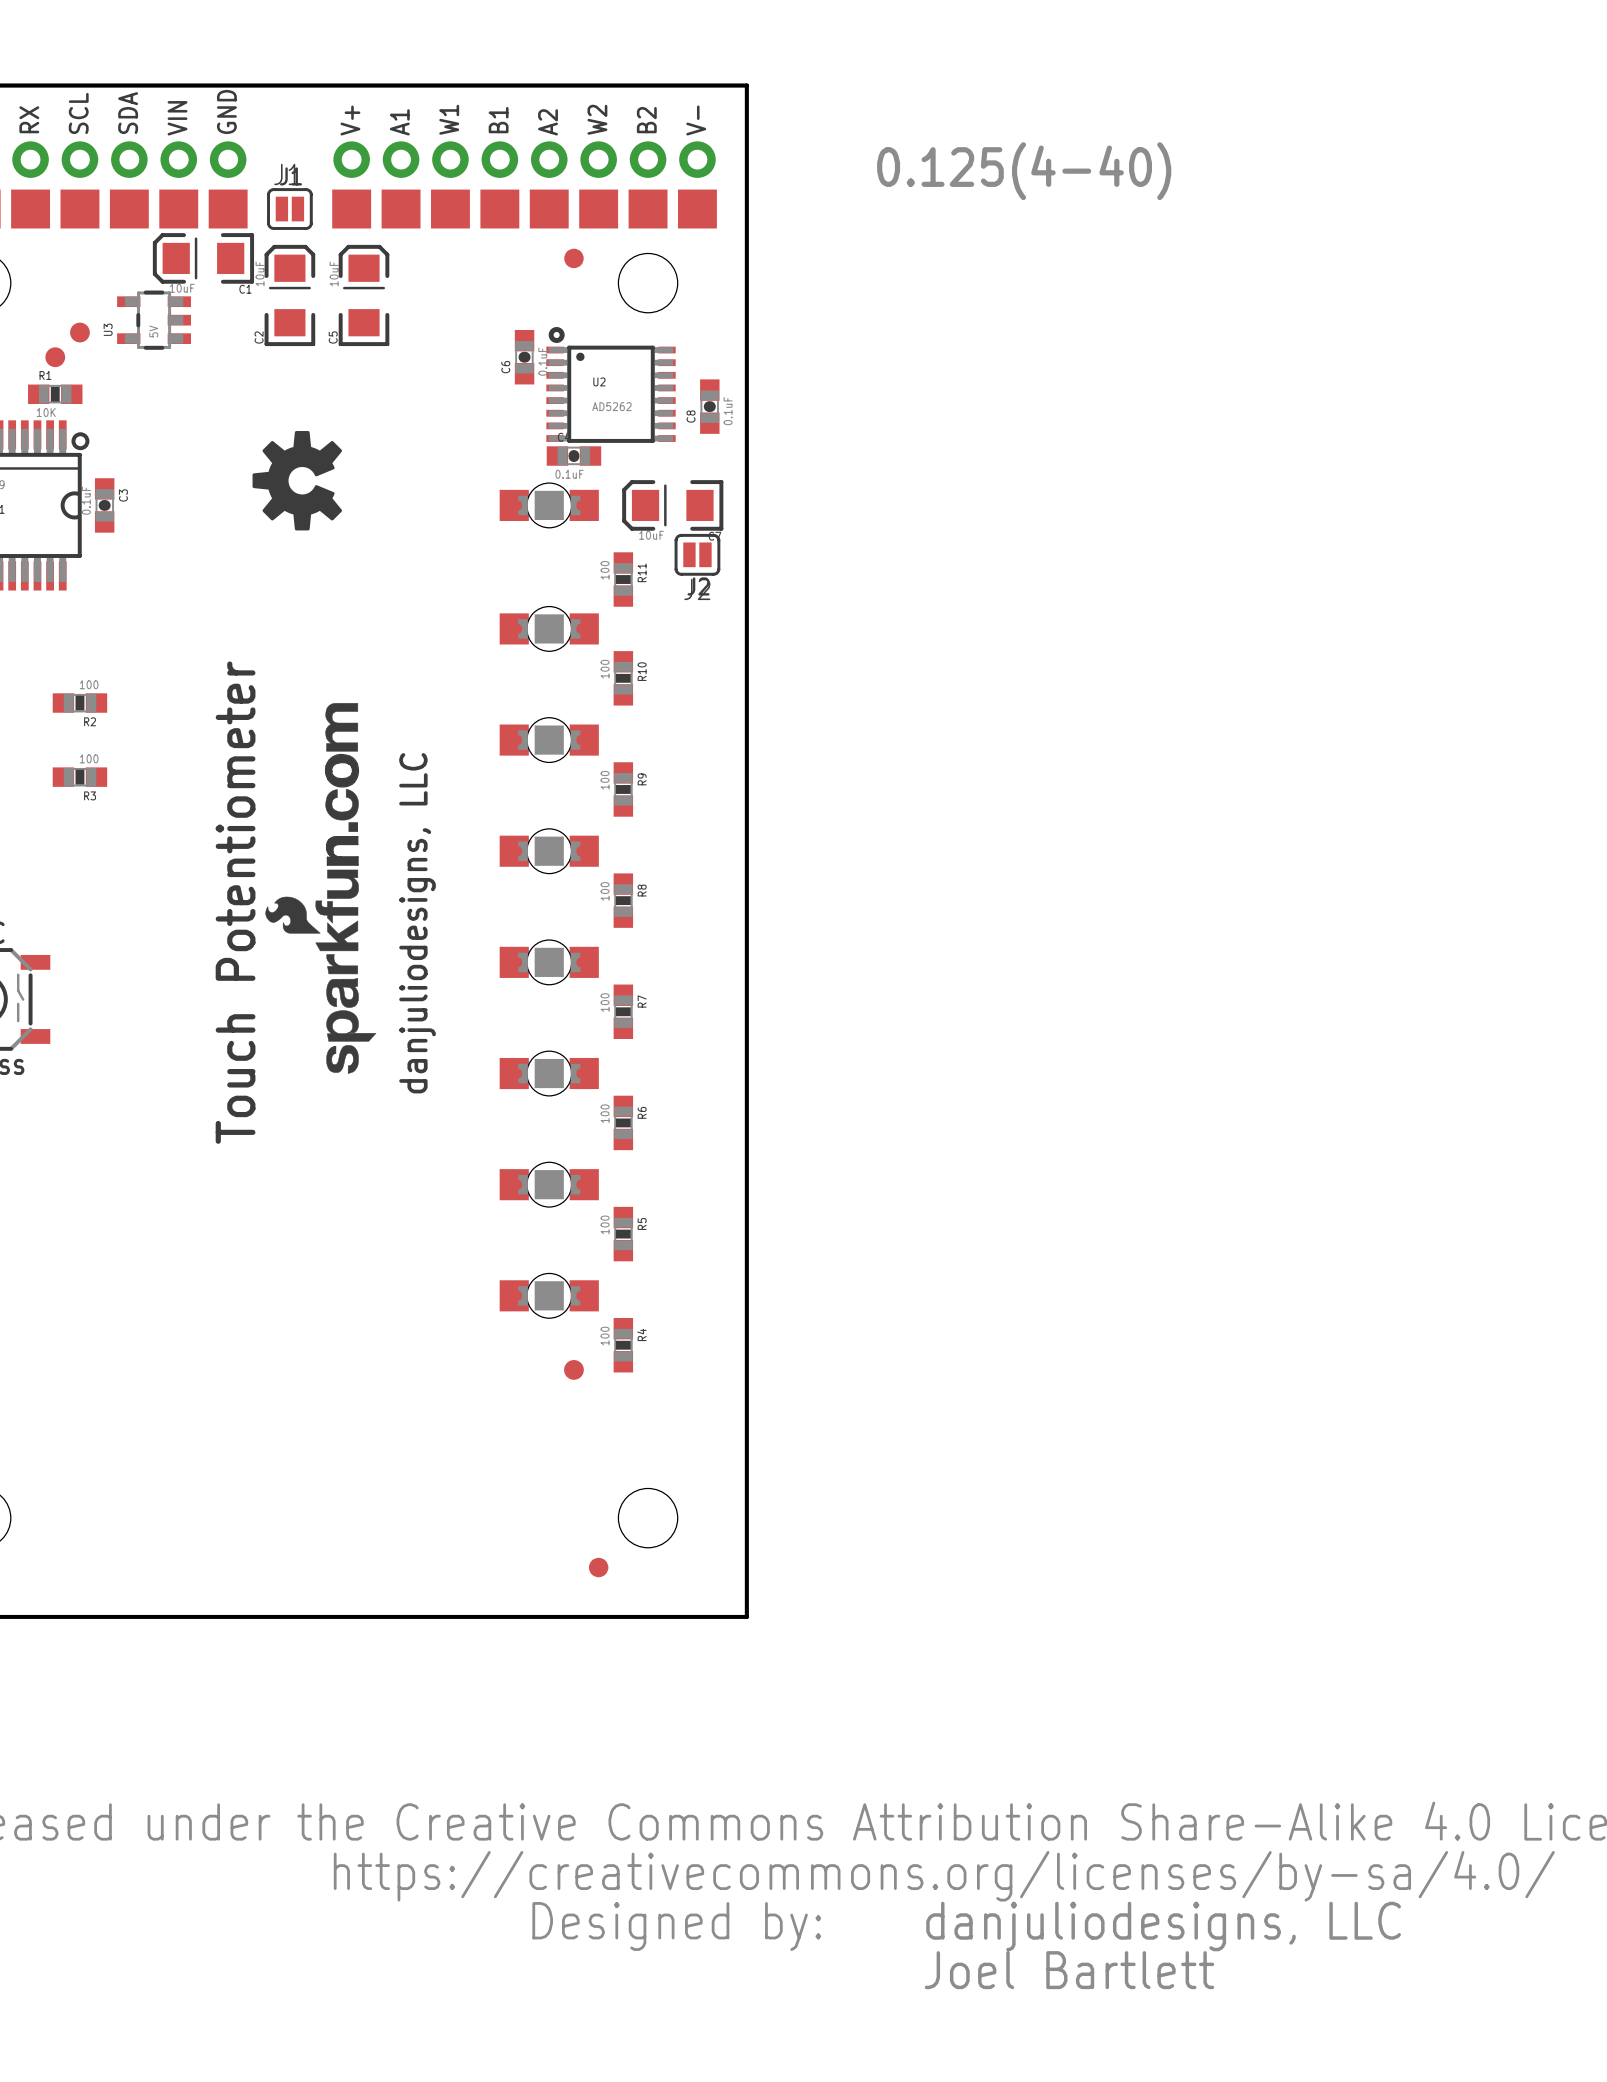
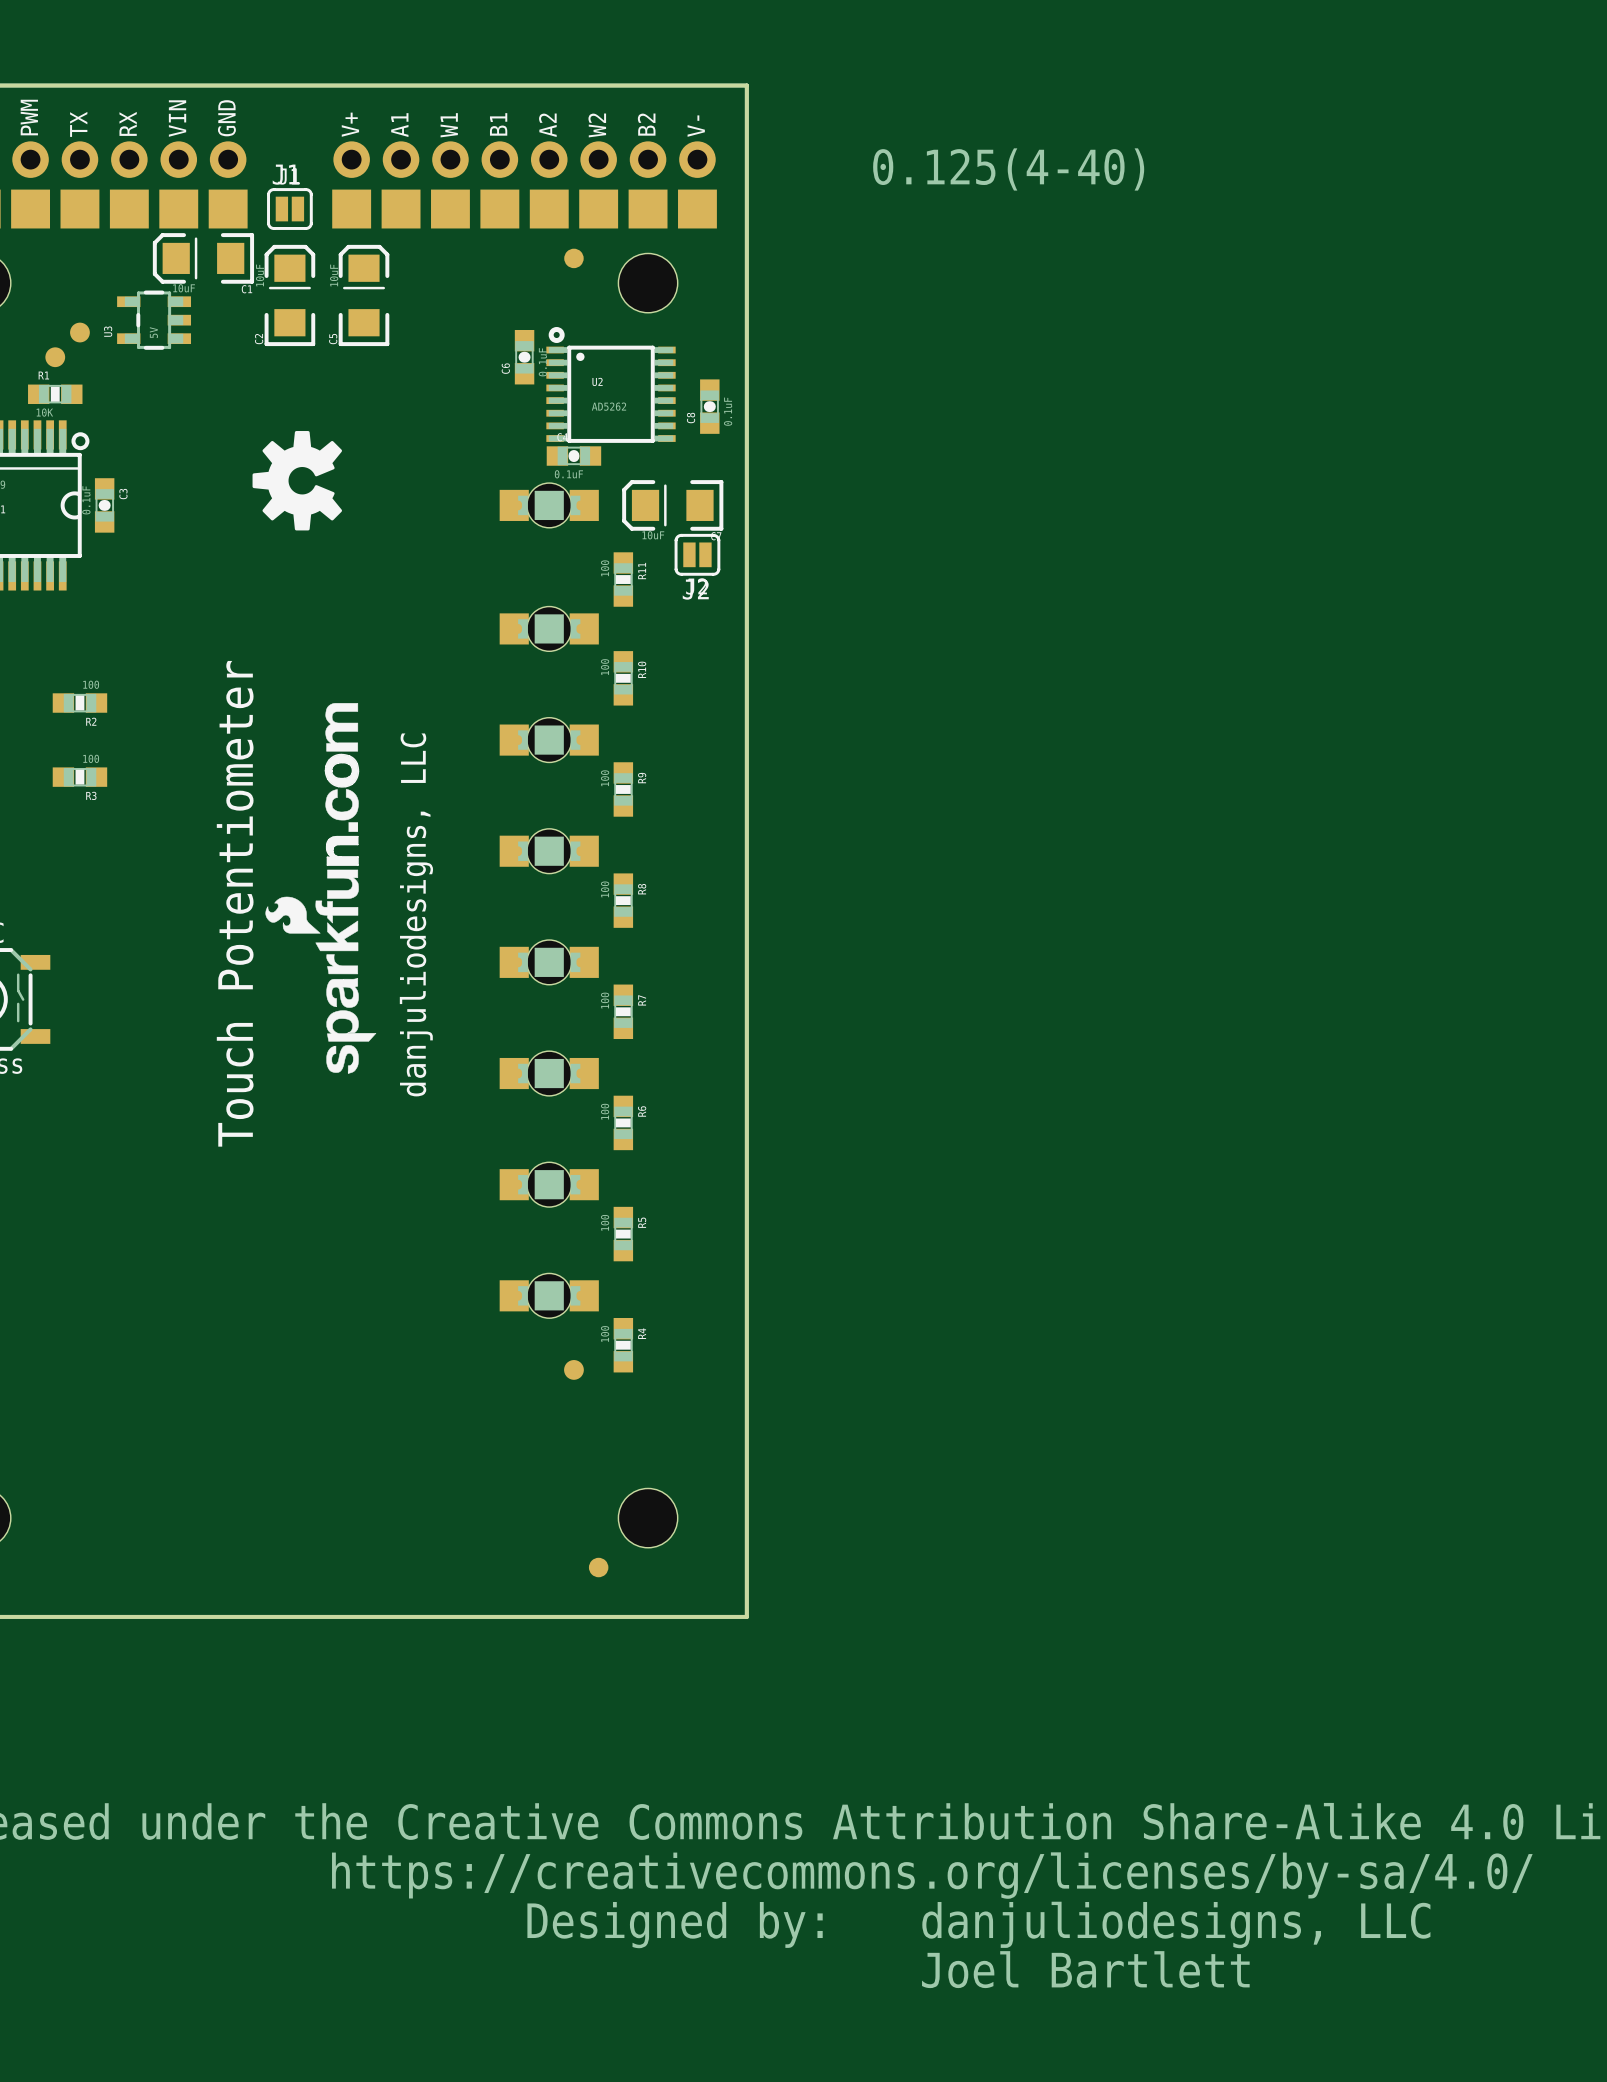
text: SCL (78, 113) -> TX (78, 124)
text: SDA (128, 113) -> RX (128, 123)
text: RX (29, 119) -> PWM (29, 117)

